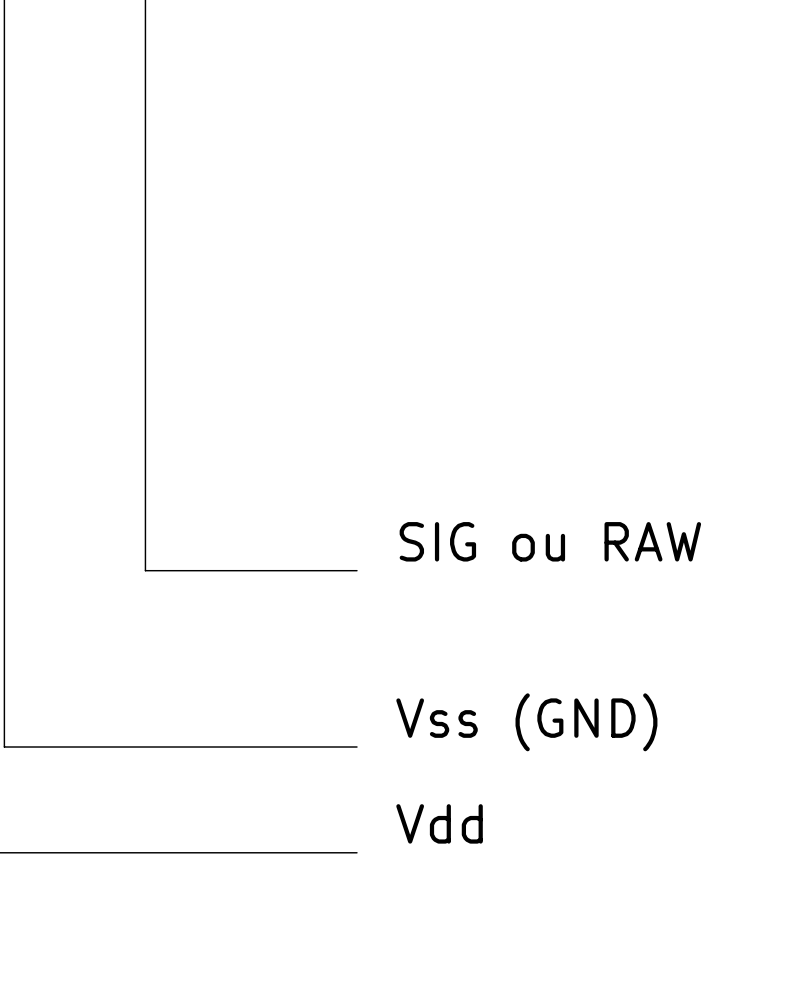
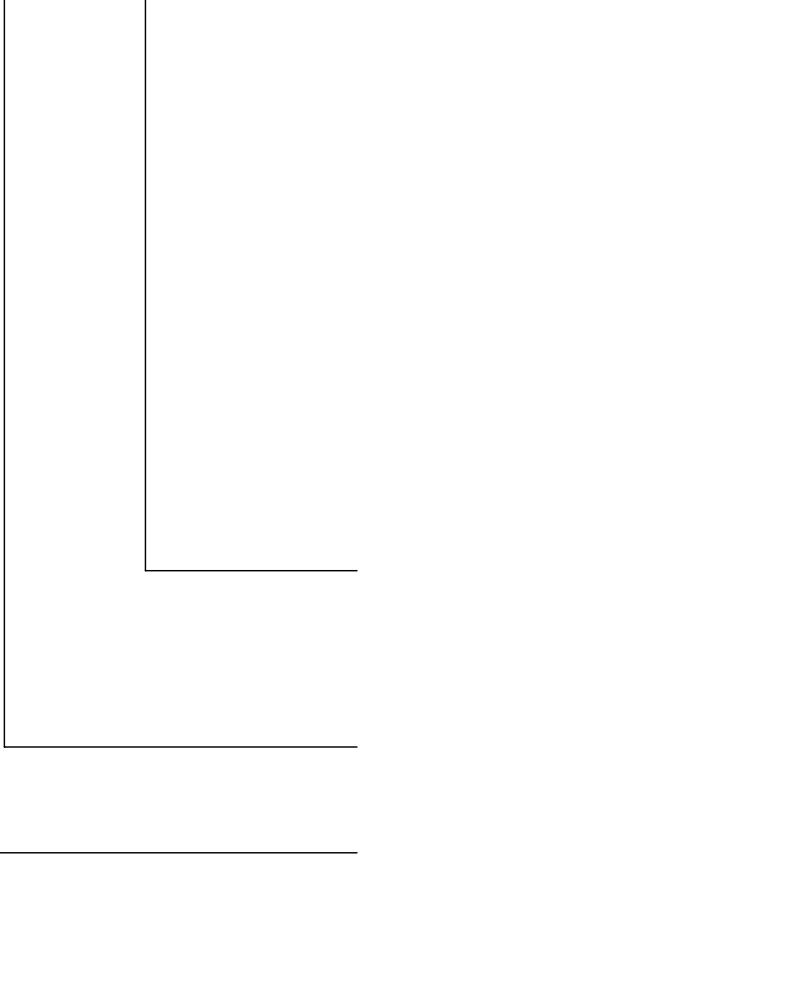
text: SIG ou RAW (550, 541) -> none
text: Vss (GND) (526, 722) -> none
text: Vdd (439, 823) -> none

